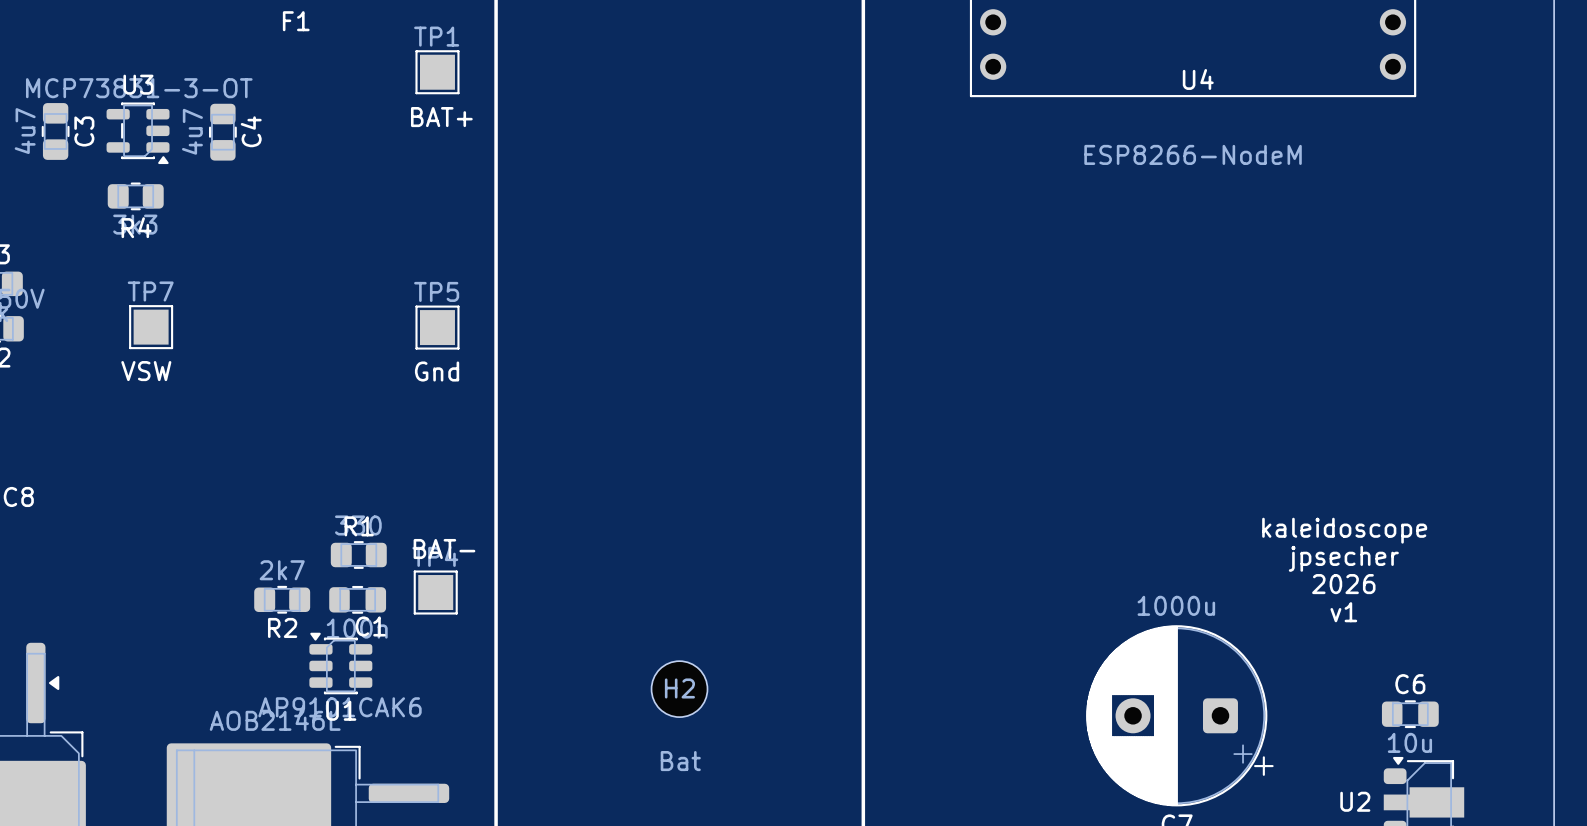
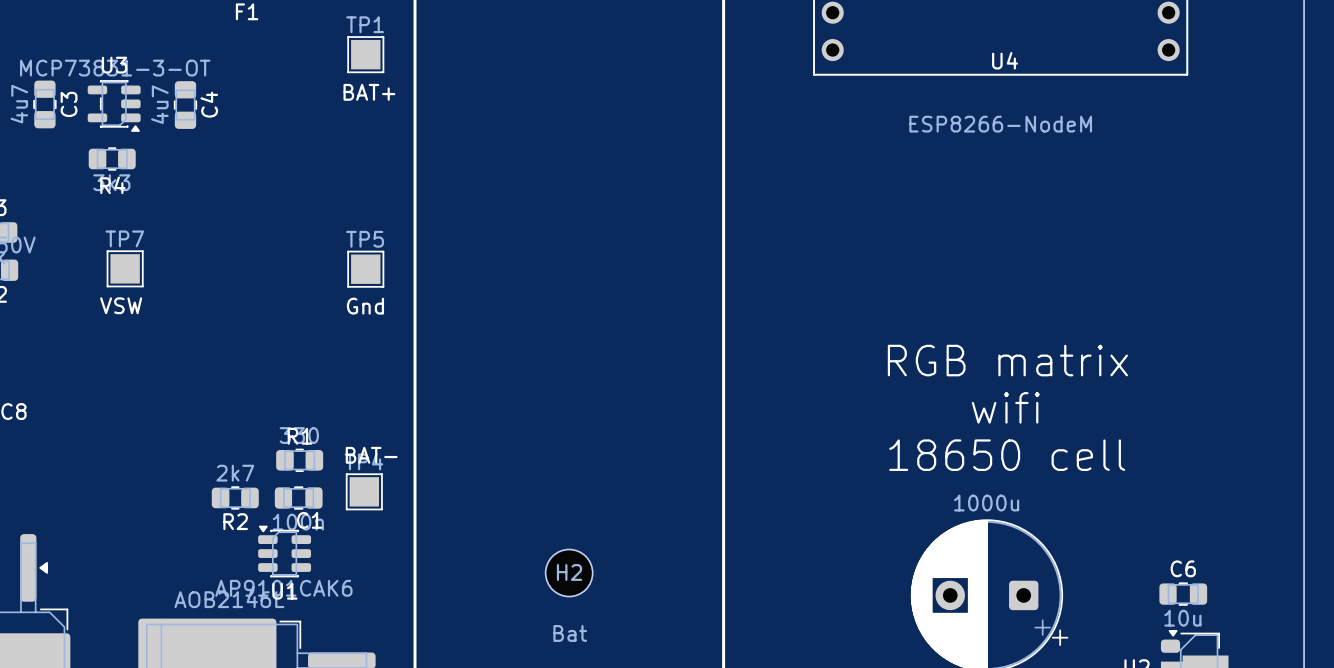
text: none -> RGB matrix (1007, 360)
text: none -> wifi (1005, 407)
text: kaleidoscope (1344, 530) -> none
text: none -> 18650 cell (1007, 455)
text: jpsecher (1343, 558) -> none
text: 2026 (1343, 584) -> none
text: v1 (1343, 612) -> none

